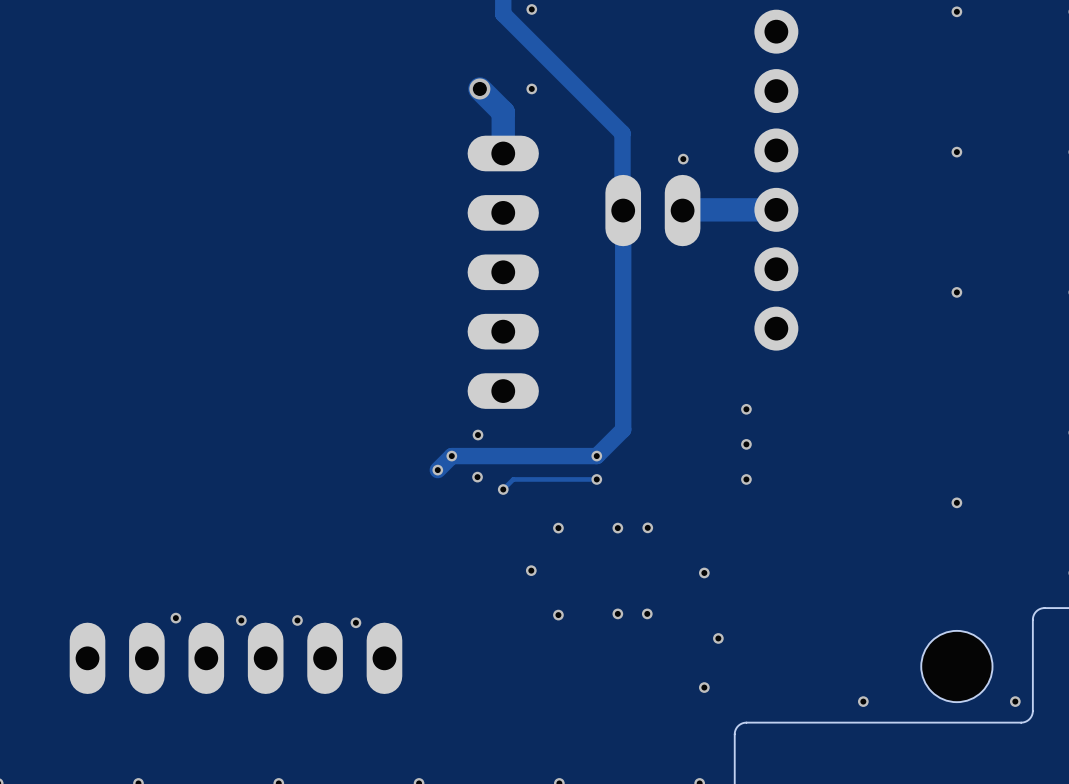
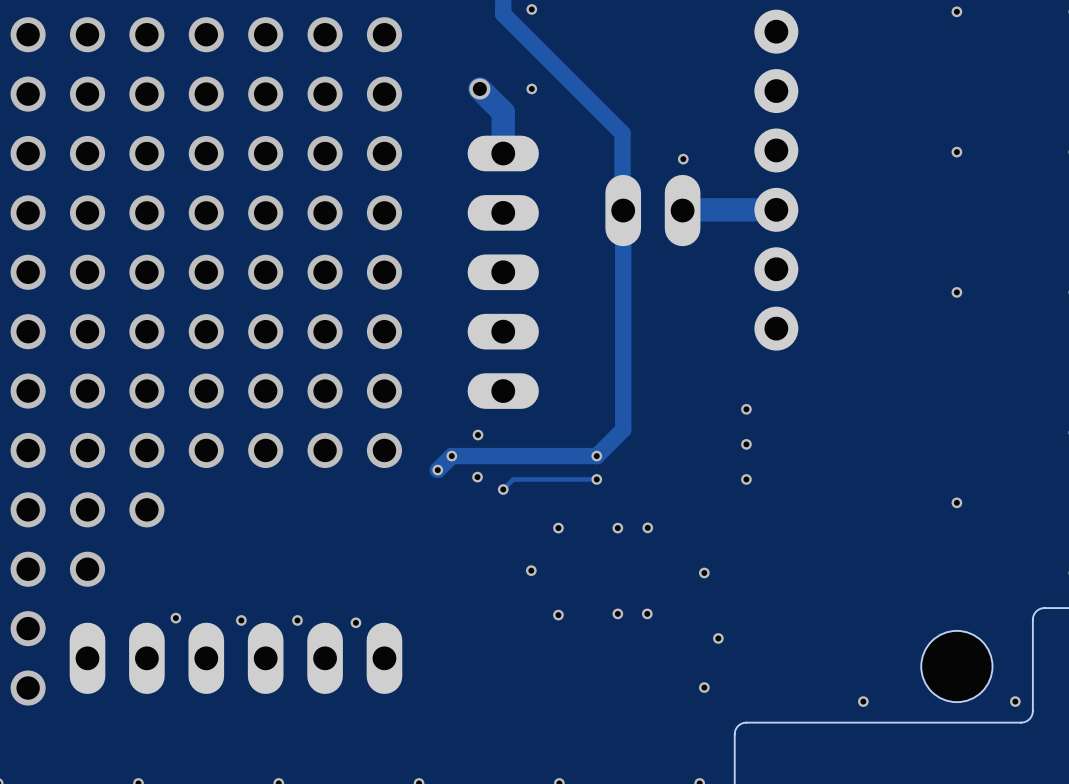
via: none -> (28, 34)
via: none -> (87, 34)
via: none -> (146, 34)
via: none -> (206, 34)
via: none -> (265, 34)
via: none -> (325, 34)
via: none -> (384, 34)
via: none -> (28, 94)
via: none -> (87, 94)
via: none -> (146, 94)
via: none -> (206, 94)
via: none -> (265, 94)
via: none -> (325, 94)
via: none -> (384, 94)
via: none -> (28, 153)
via: none -> (87, 153)
via: none -> (146, 153)
via: none -> (206, 153)
via: none -> (265, 153)
via: none -> (325, 153)
via: none -> (384, 153)
via: none -> (28, 212)
via: none -> (87, 212)
via: none -> (146, 212)
via: none -> (206, 212)
via: none -> (265, 212)
via: none -> (325, 212)
via: none -> (384, 212)
via: none -> (28, 272)
via: none -> (87, 272)
via: none -> (146, 272)
via: none -> (206, 272)
via: none -> (265, 272)
via: none -> (325, 272)
via: none -> (384, 272)
via: none -> (28, 331)
via: none -> (87, 331)
via: none -> (146, 331)
via: none -> (206, 331)
via: none -> (265, 331)
via: none -> (325, 331)
via: none -> (384, 331)
via: none -> (28, 391)
via: none -> (87, 391)
via: none -> (146, 391)
via: none -> (206, 391)
via: none -> (265, 391)
via: none -> (325, 391)
via: none -> (384, 391)
via: none -> (28, 450)
via: none -> (87, 450)
via: none -> (146, 450)
via: none -> (206, 450)
via: none -> (265, 450)
via: none -> (325, 450)
via: none -> (384, 450)
via: none -> (28, 509)
via: none -> (87, 509)
via: none -> (146, 509)
via: none -> (28, 569)
via: none -> (87, 569)
via: none -> (28, 628)
via: none -> (28, 688)

